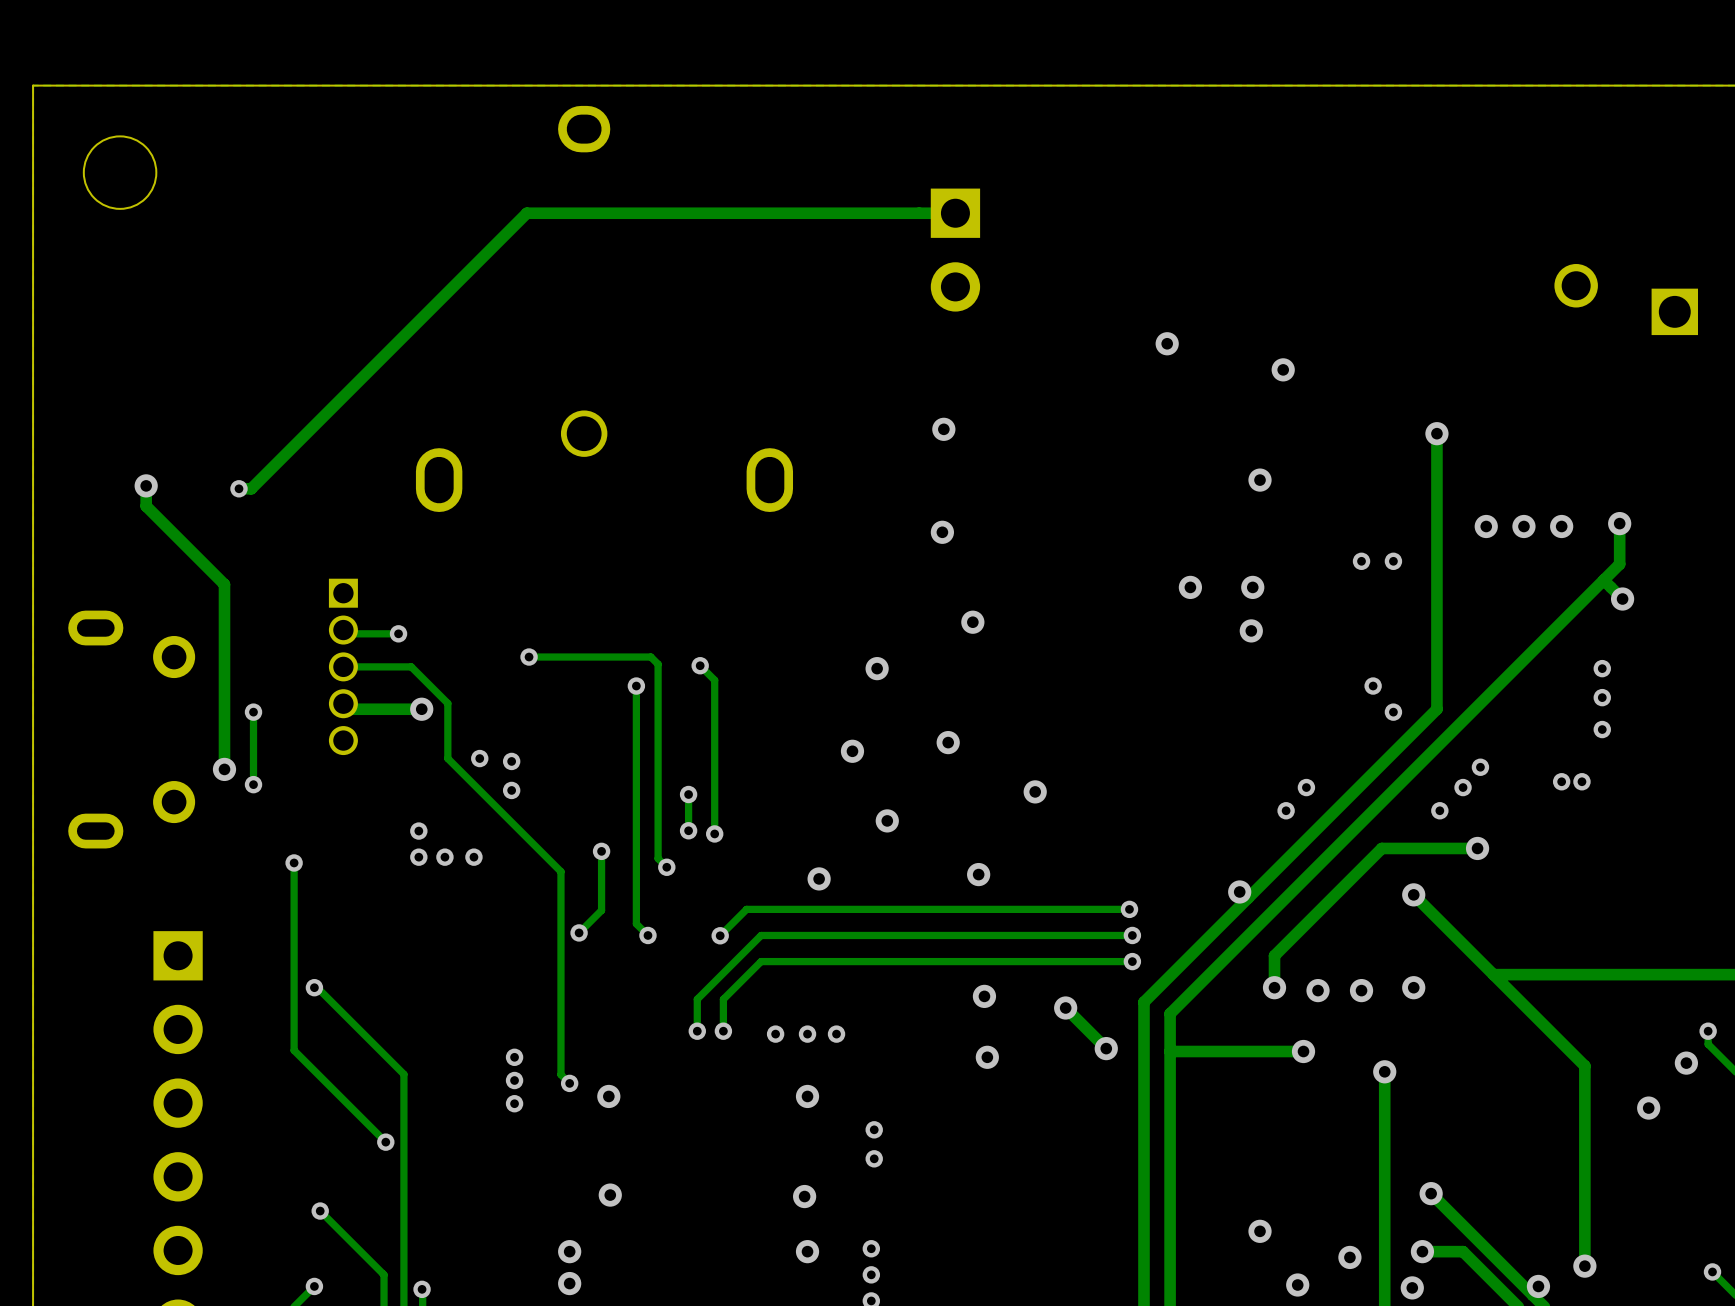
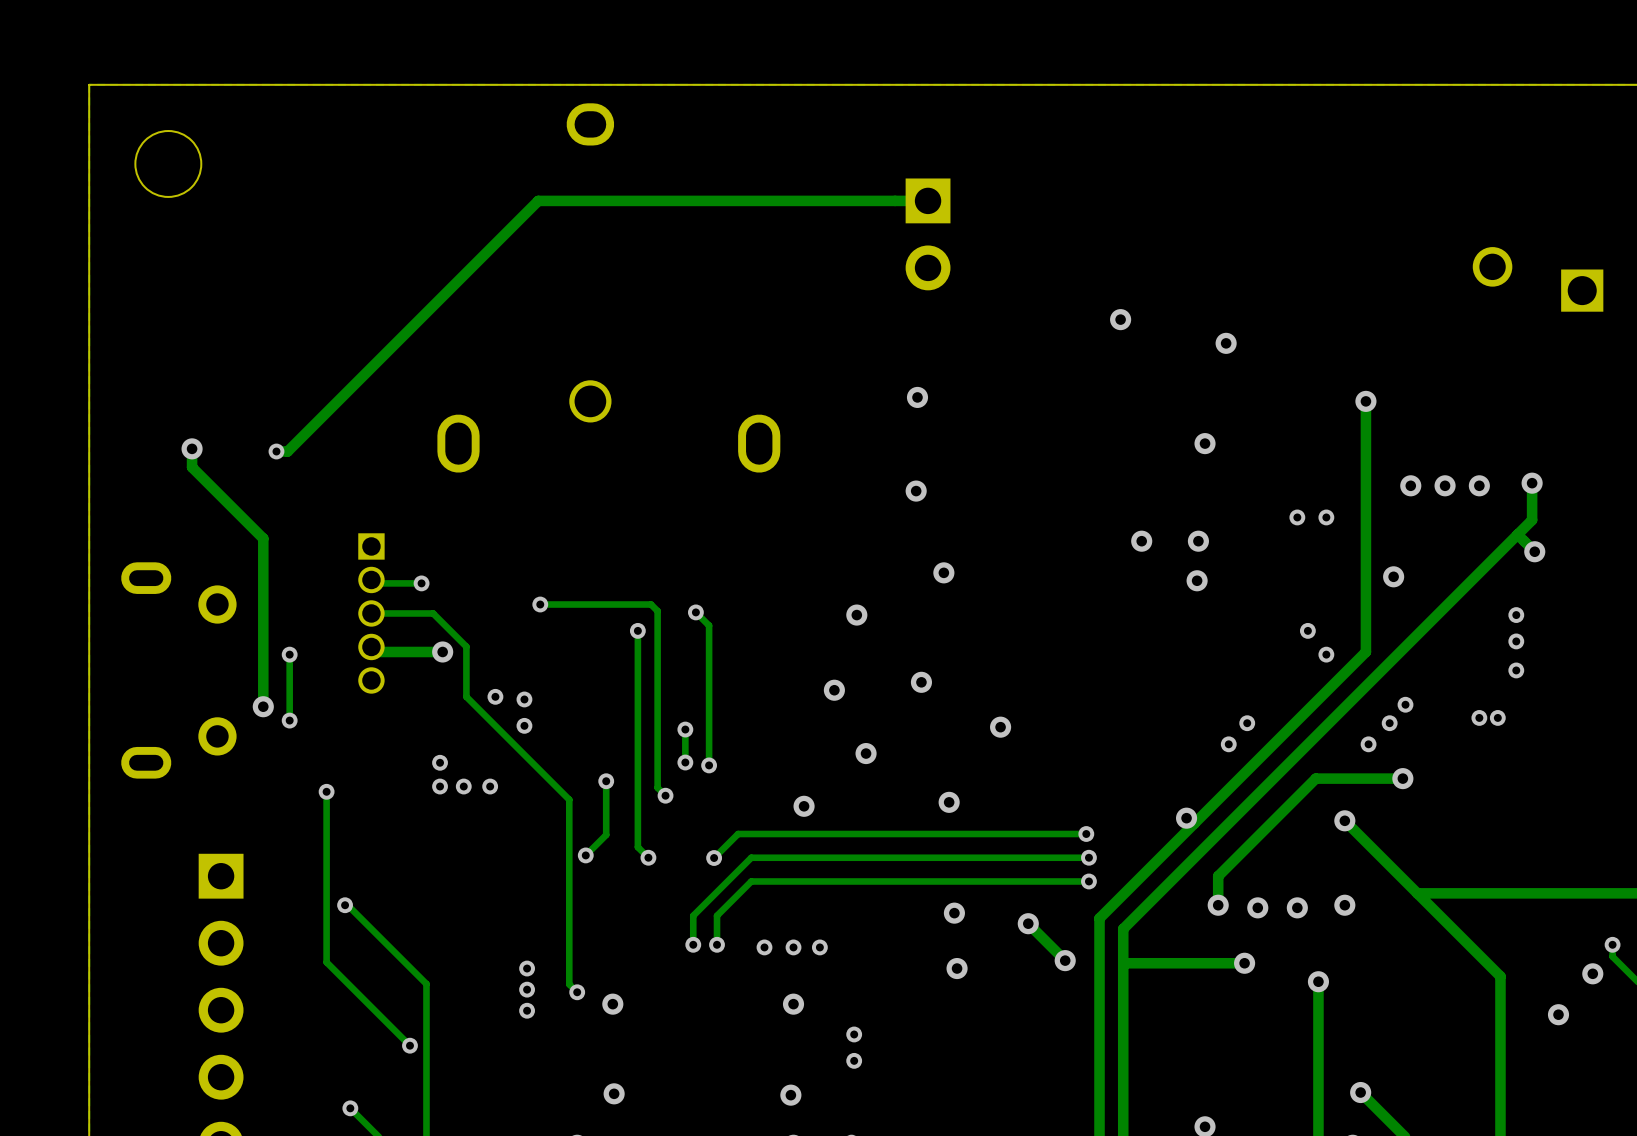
via: none -> (1393, 576)

